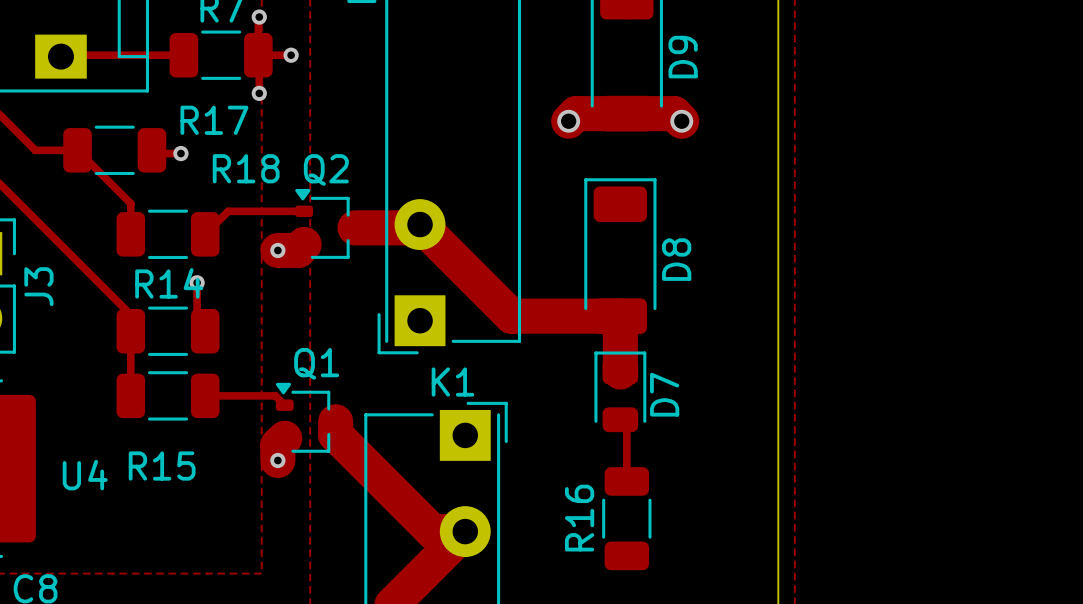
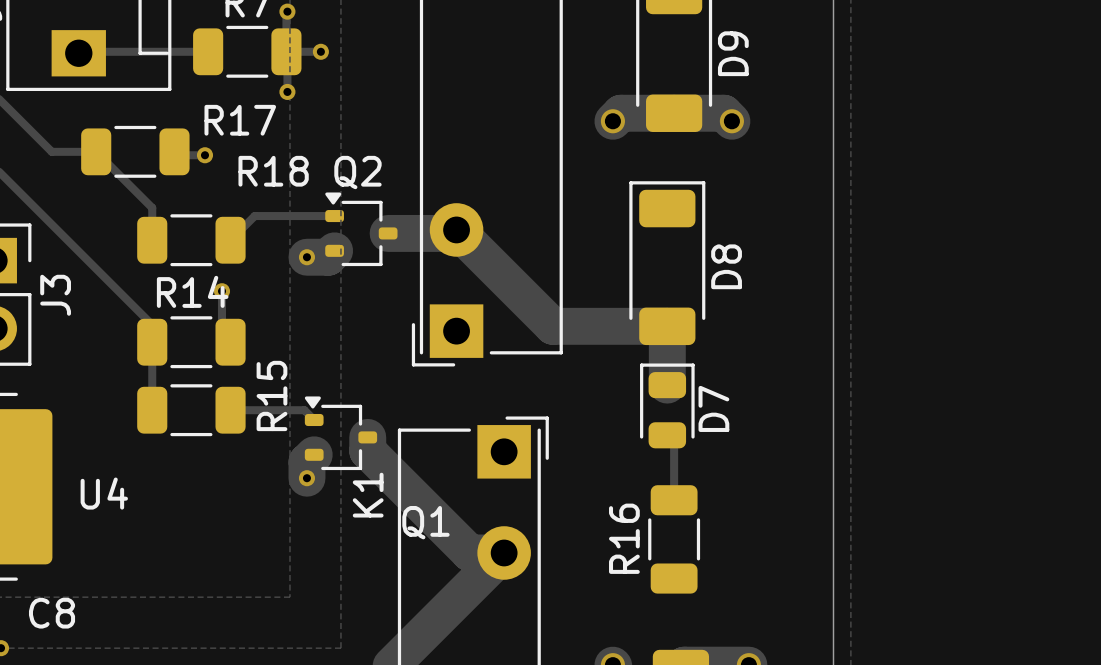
Q1 name position: Q1 (316, 363) -> Q1 (425, 522)
K1 name rotation: 0° (452, 382) -> 90° counterclockwise (368, 495)
K1 name position: K1 (452, 382) -> K1 (368, 495)
R15 name rotation: 0° (162, 466) -> 90° counterclockwise (271, 395)
R15 name position: R15 (162, 466) -> R15 (271, 395)

